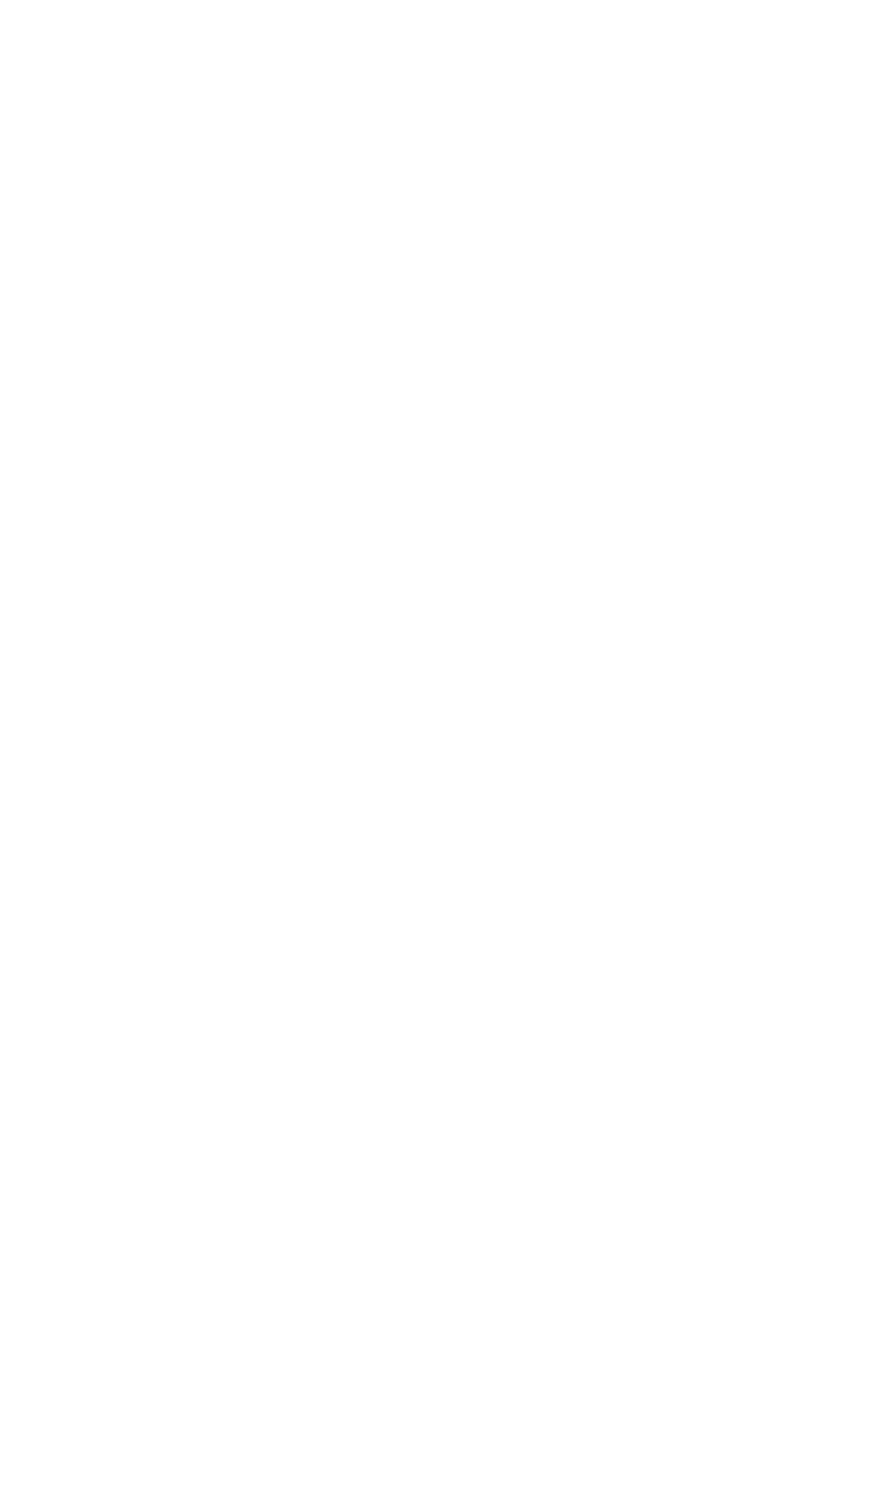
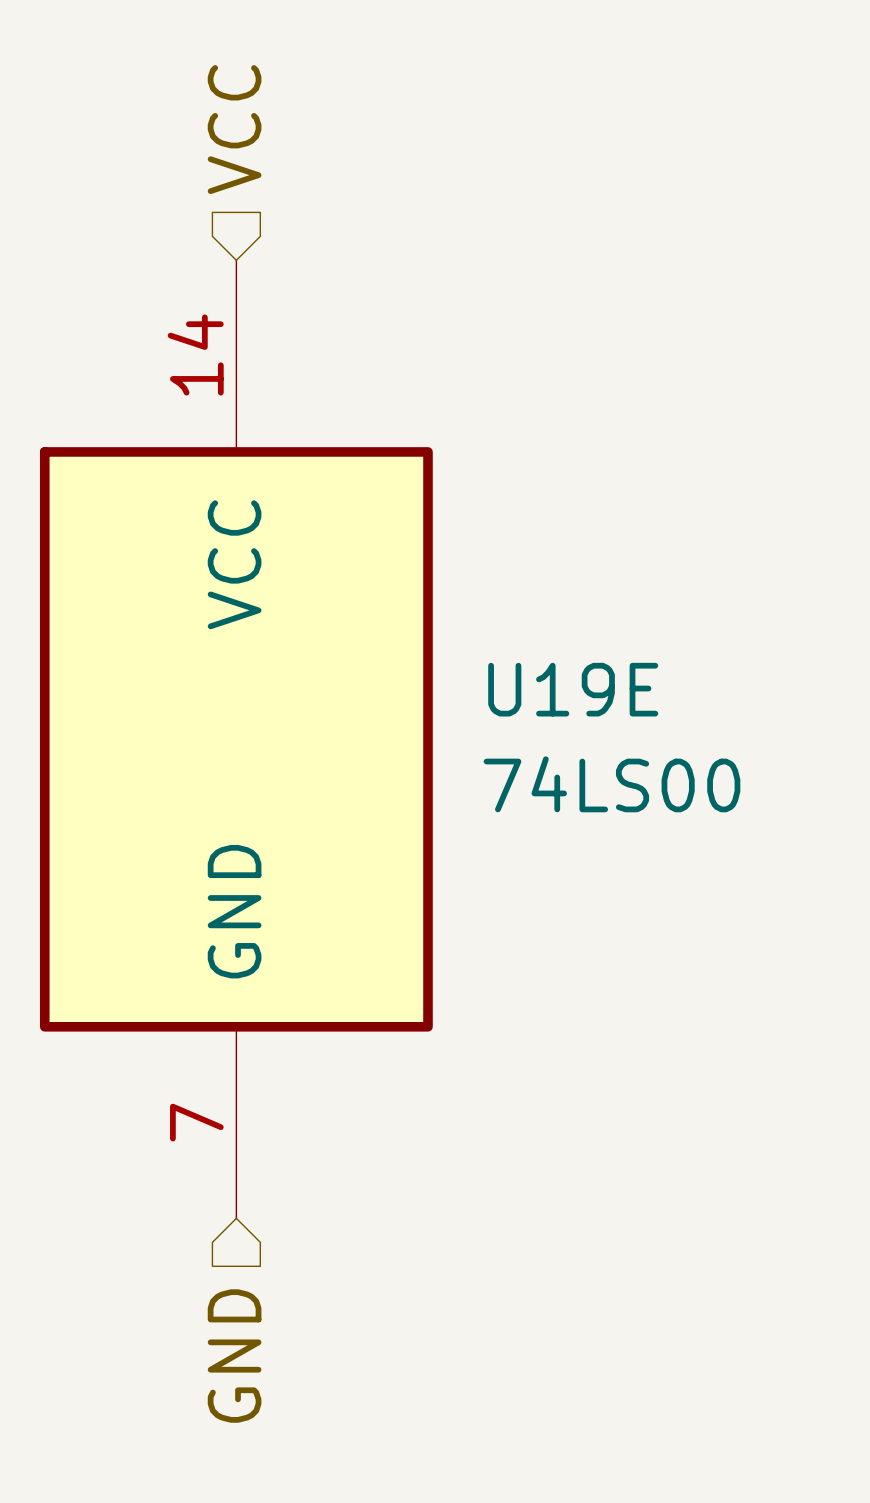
hierarchical label: none -> VCC (234, 129)
U19E: none -> 74LS00 (236, 739)
hierarchical label: none -> GND (234, 1356)

